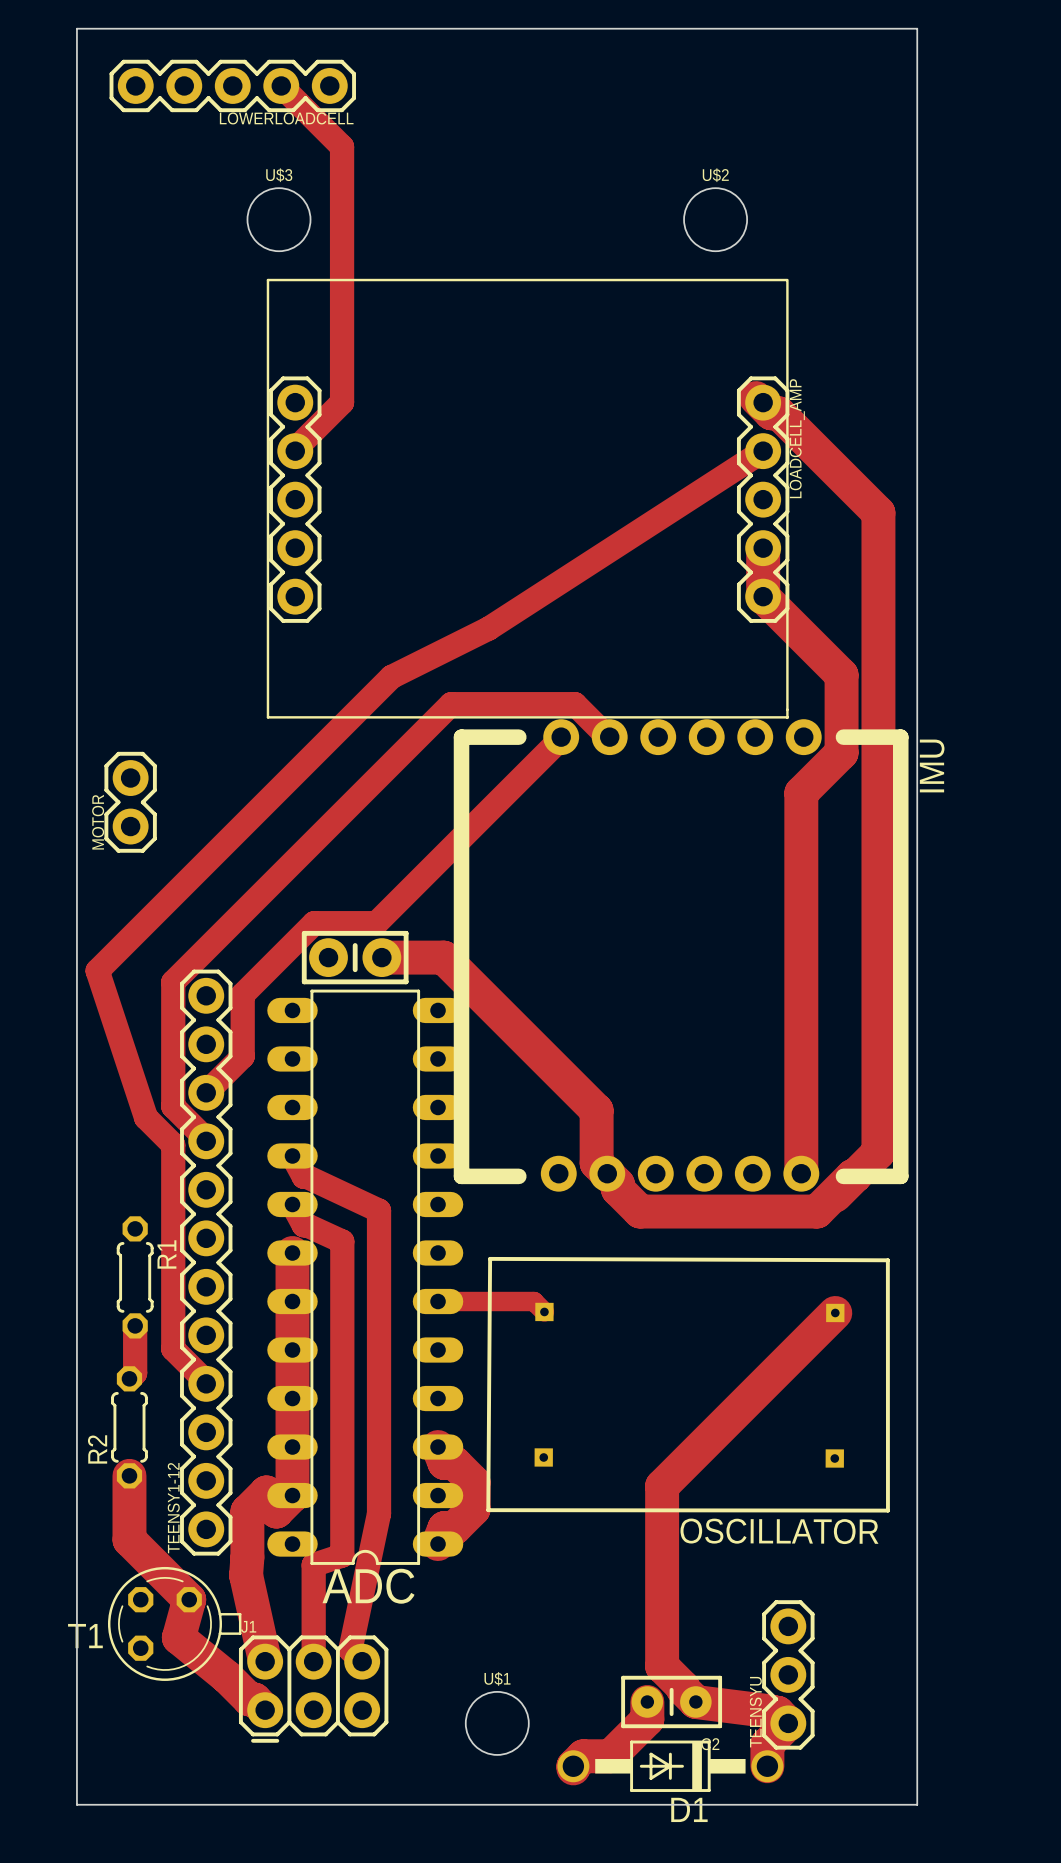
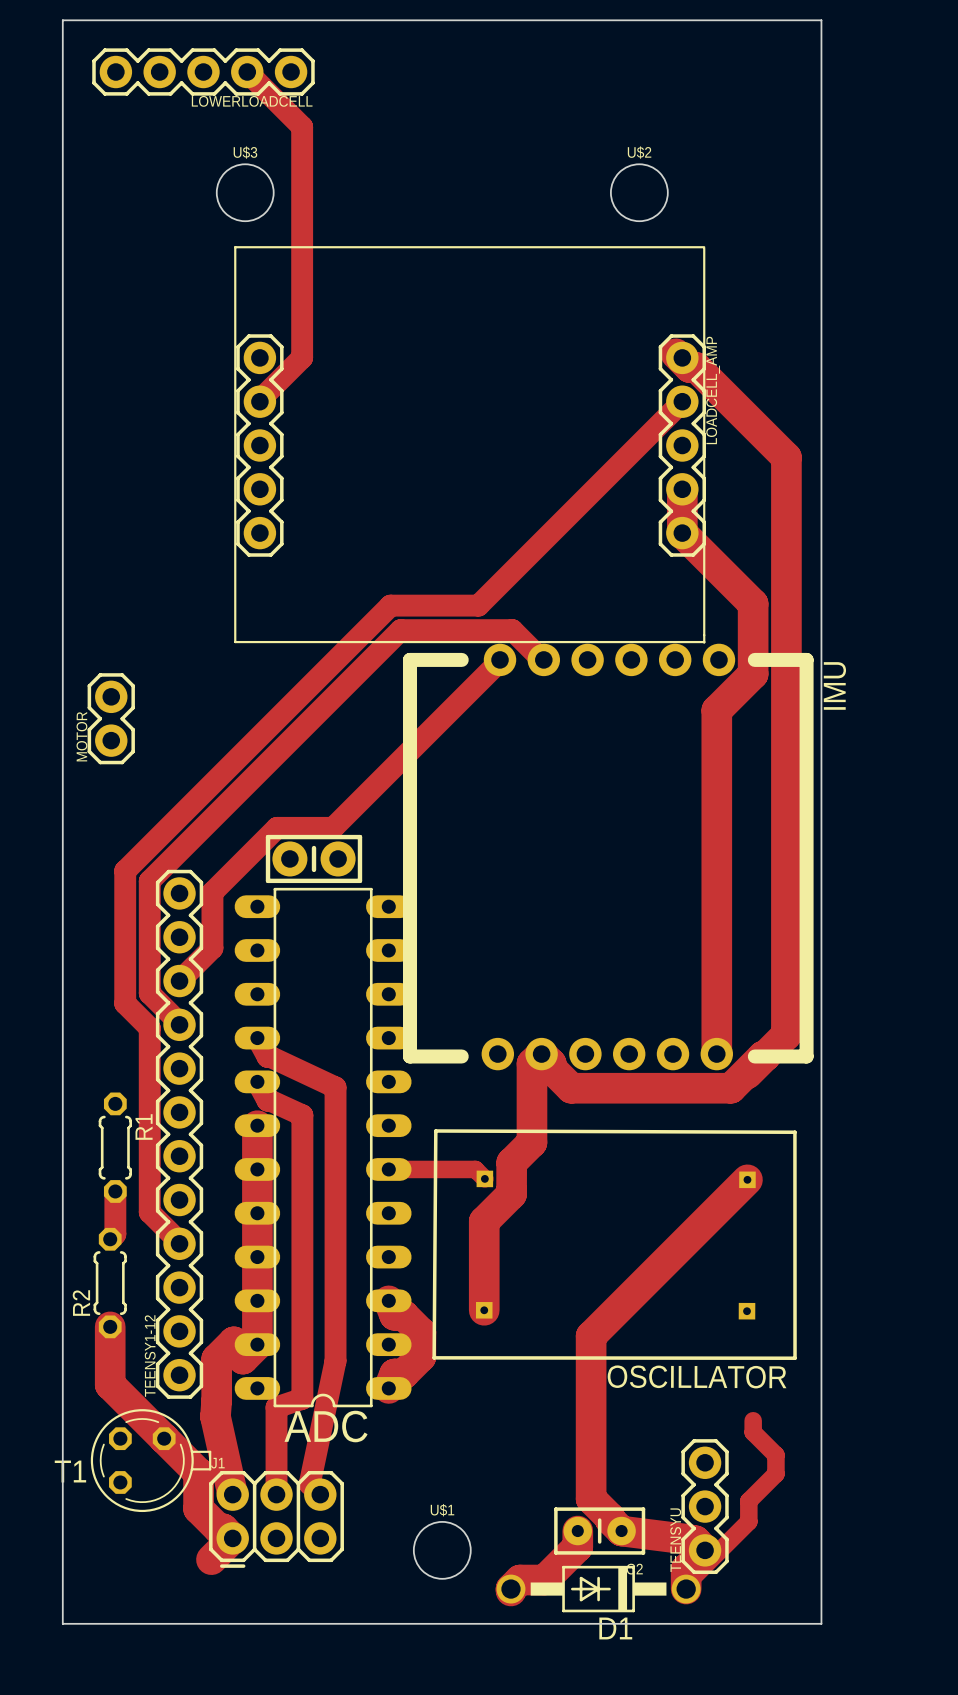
track: (763, 451) (488, 628) (391, 677) (97, 970) (146, 1117) -> (682, 401) (478, 605) (390, 605) (125, 870) (125, 1003)
track: (381, 957) (443, 957) (596, 1110) (596, 1163) (607, 1173) -> (484, 1310) (484, 1221) (511, 1194) (511, 1162) (531, 1142) (531, 1063) (541, 1054)
track: none -> (753, 1420) (753, 1432) (775, 1455) (775, 1473) (748, 1501) (748, 1521) (690, 1580)
track: (189, 1599) (178, 1637) (227, 1677) -> (164, 1438) (198, 1473) (198, 1508)
track: none -> (232, 1538) (211, 1559)

